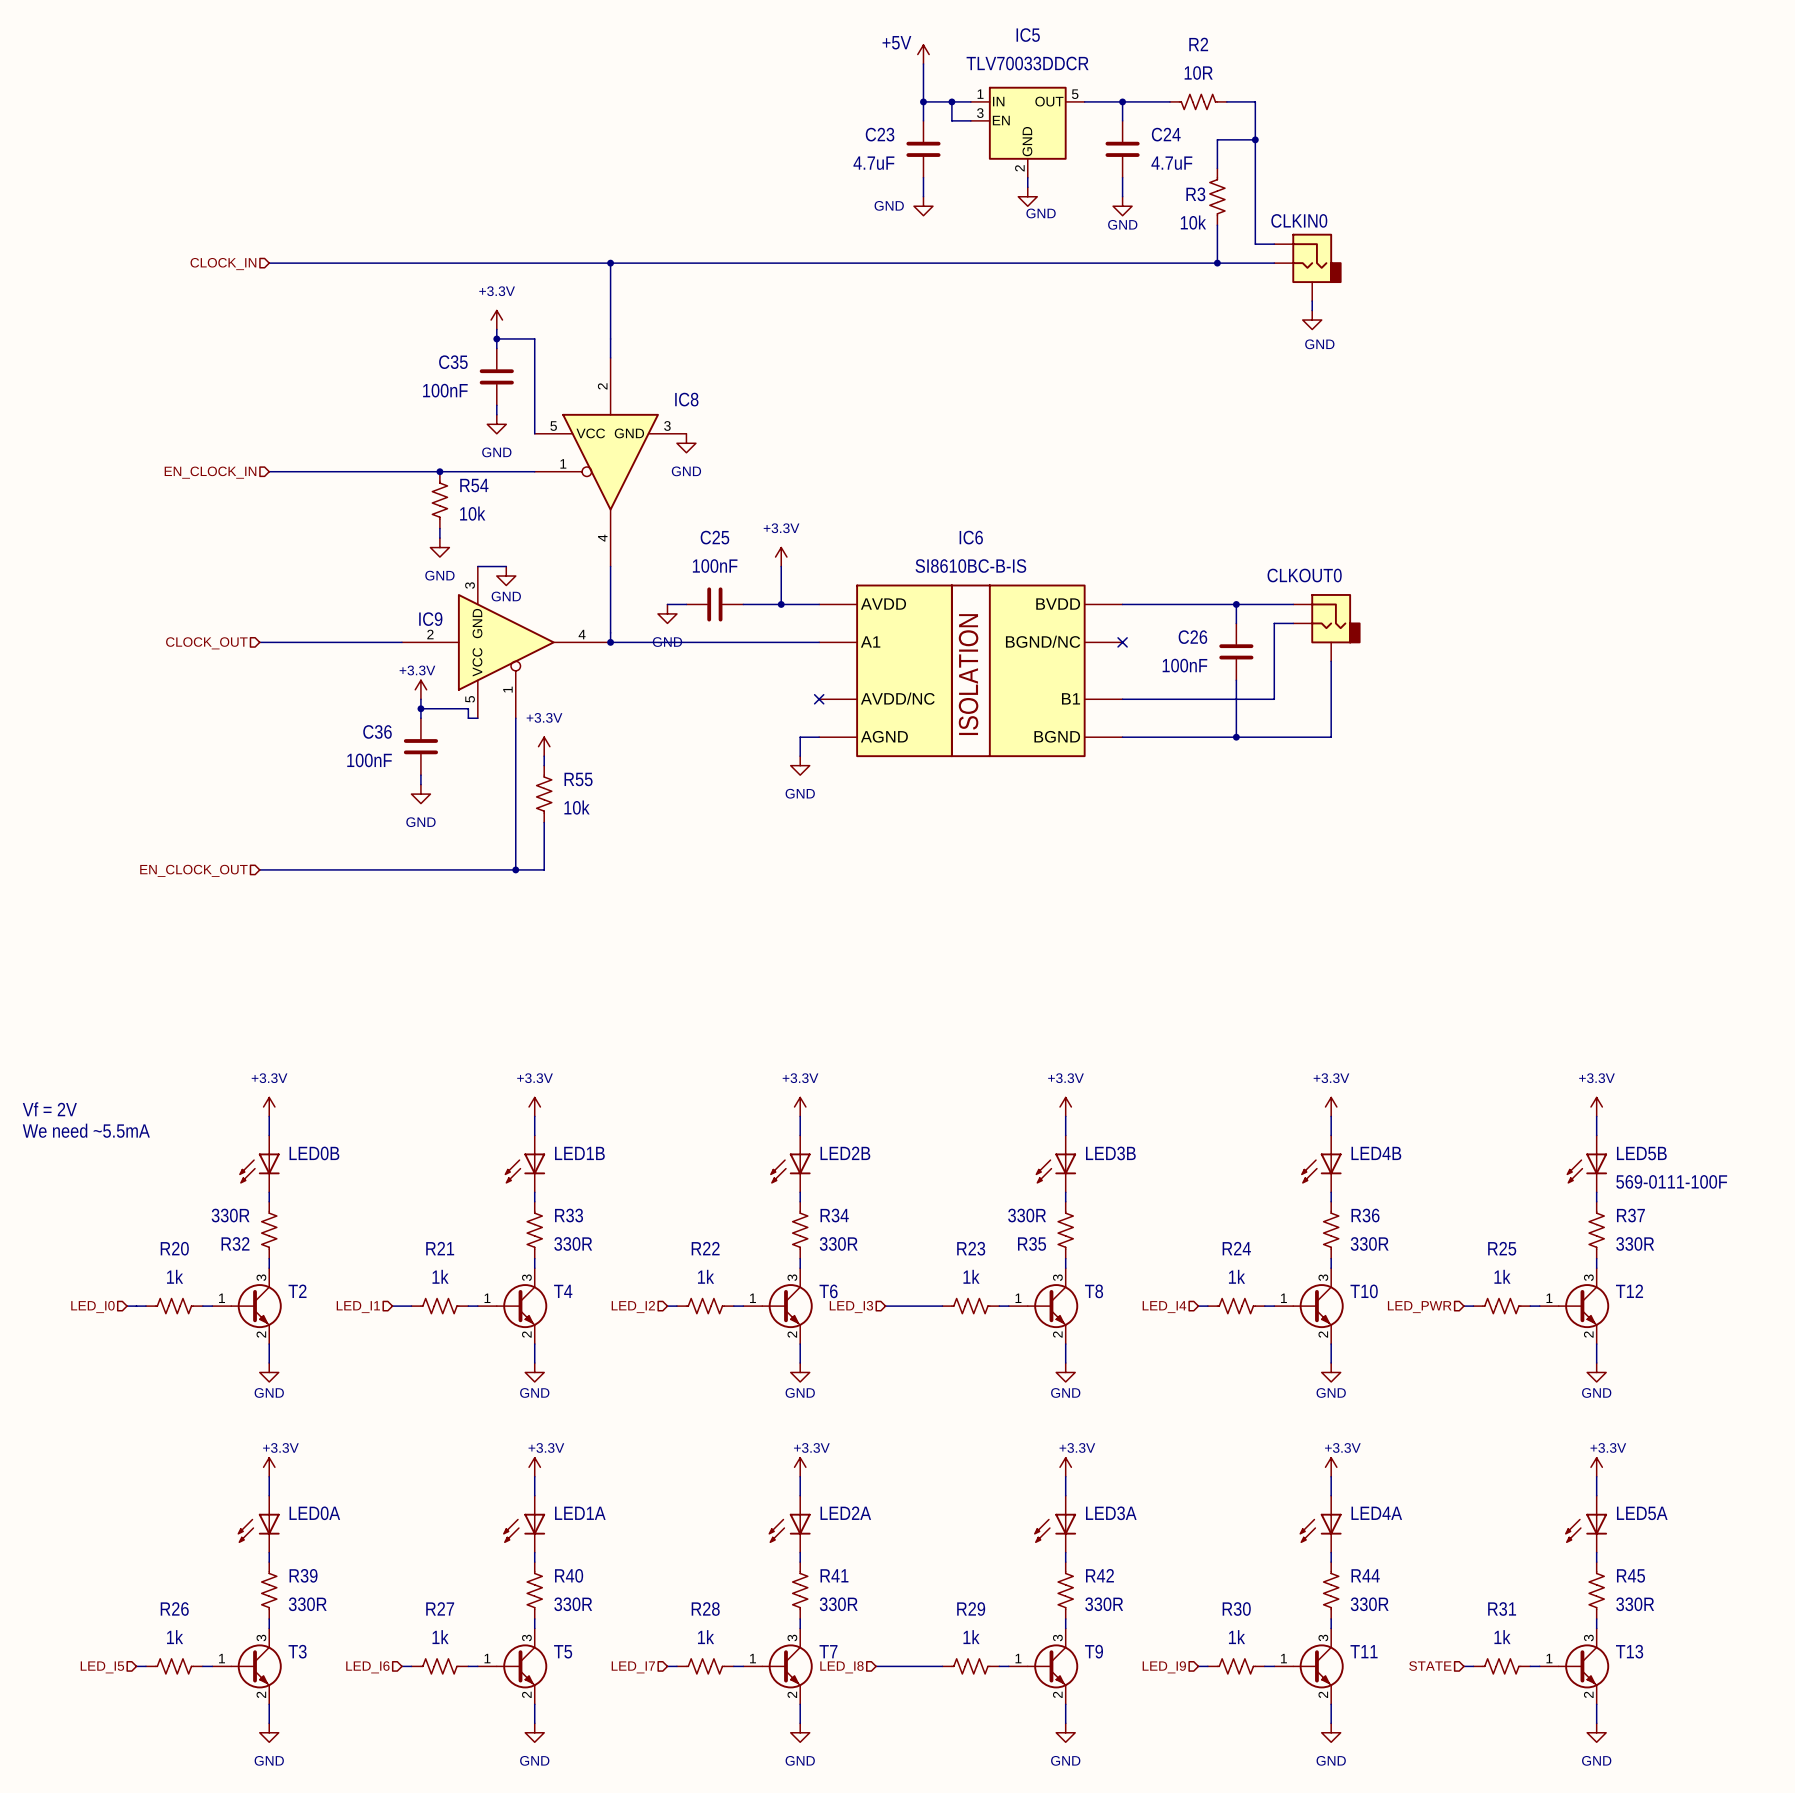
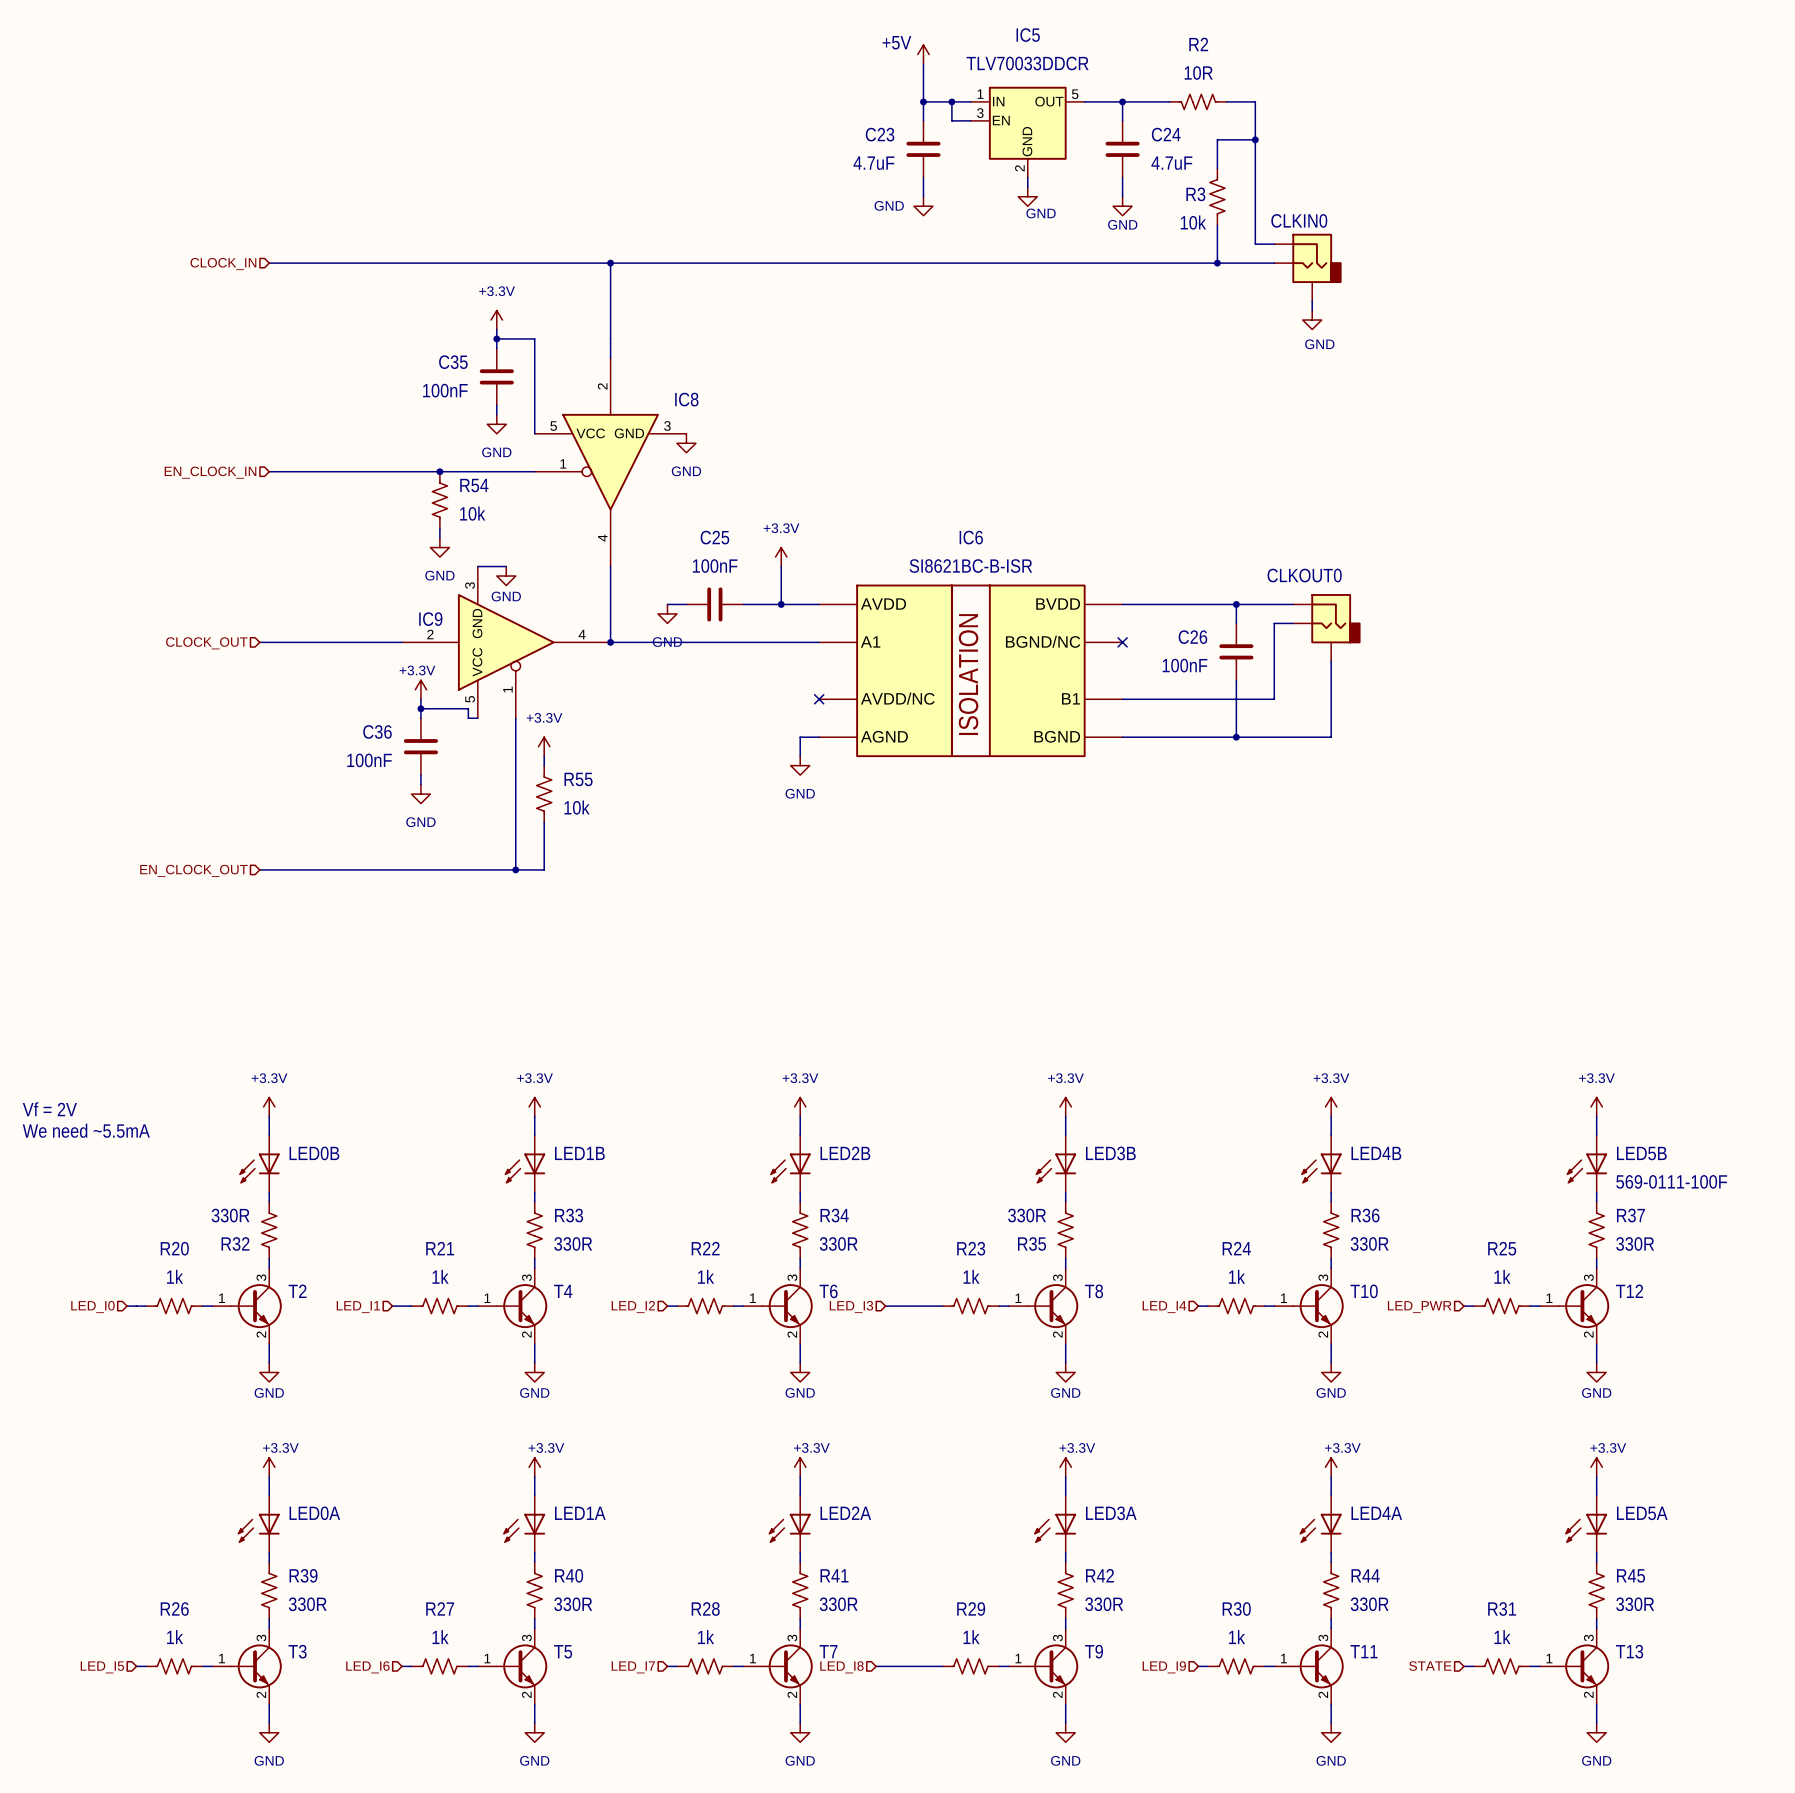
IC6 value: SI8610BC-B-IS (970, 566) -> SI8621BC-B-ISR (970, 566)

